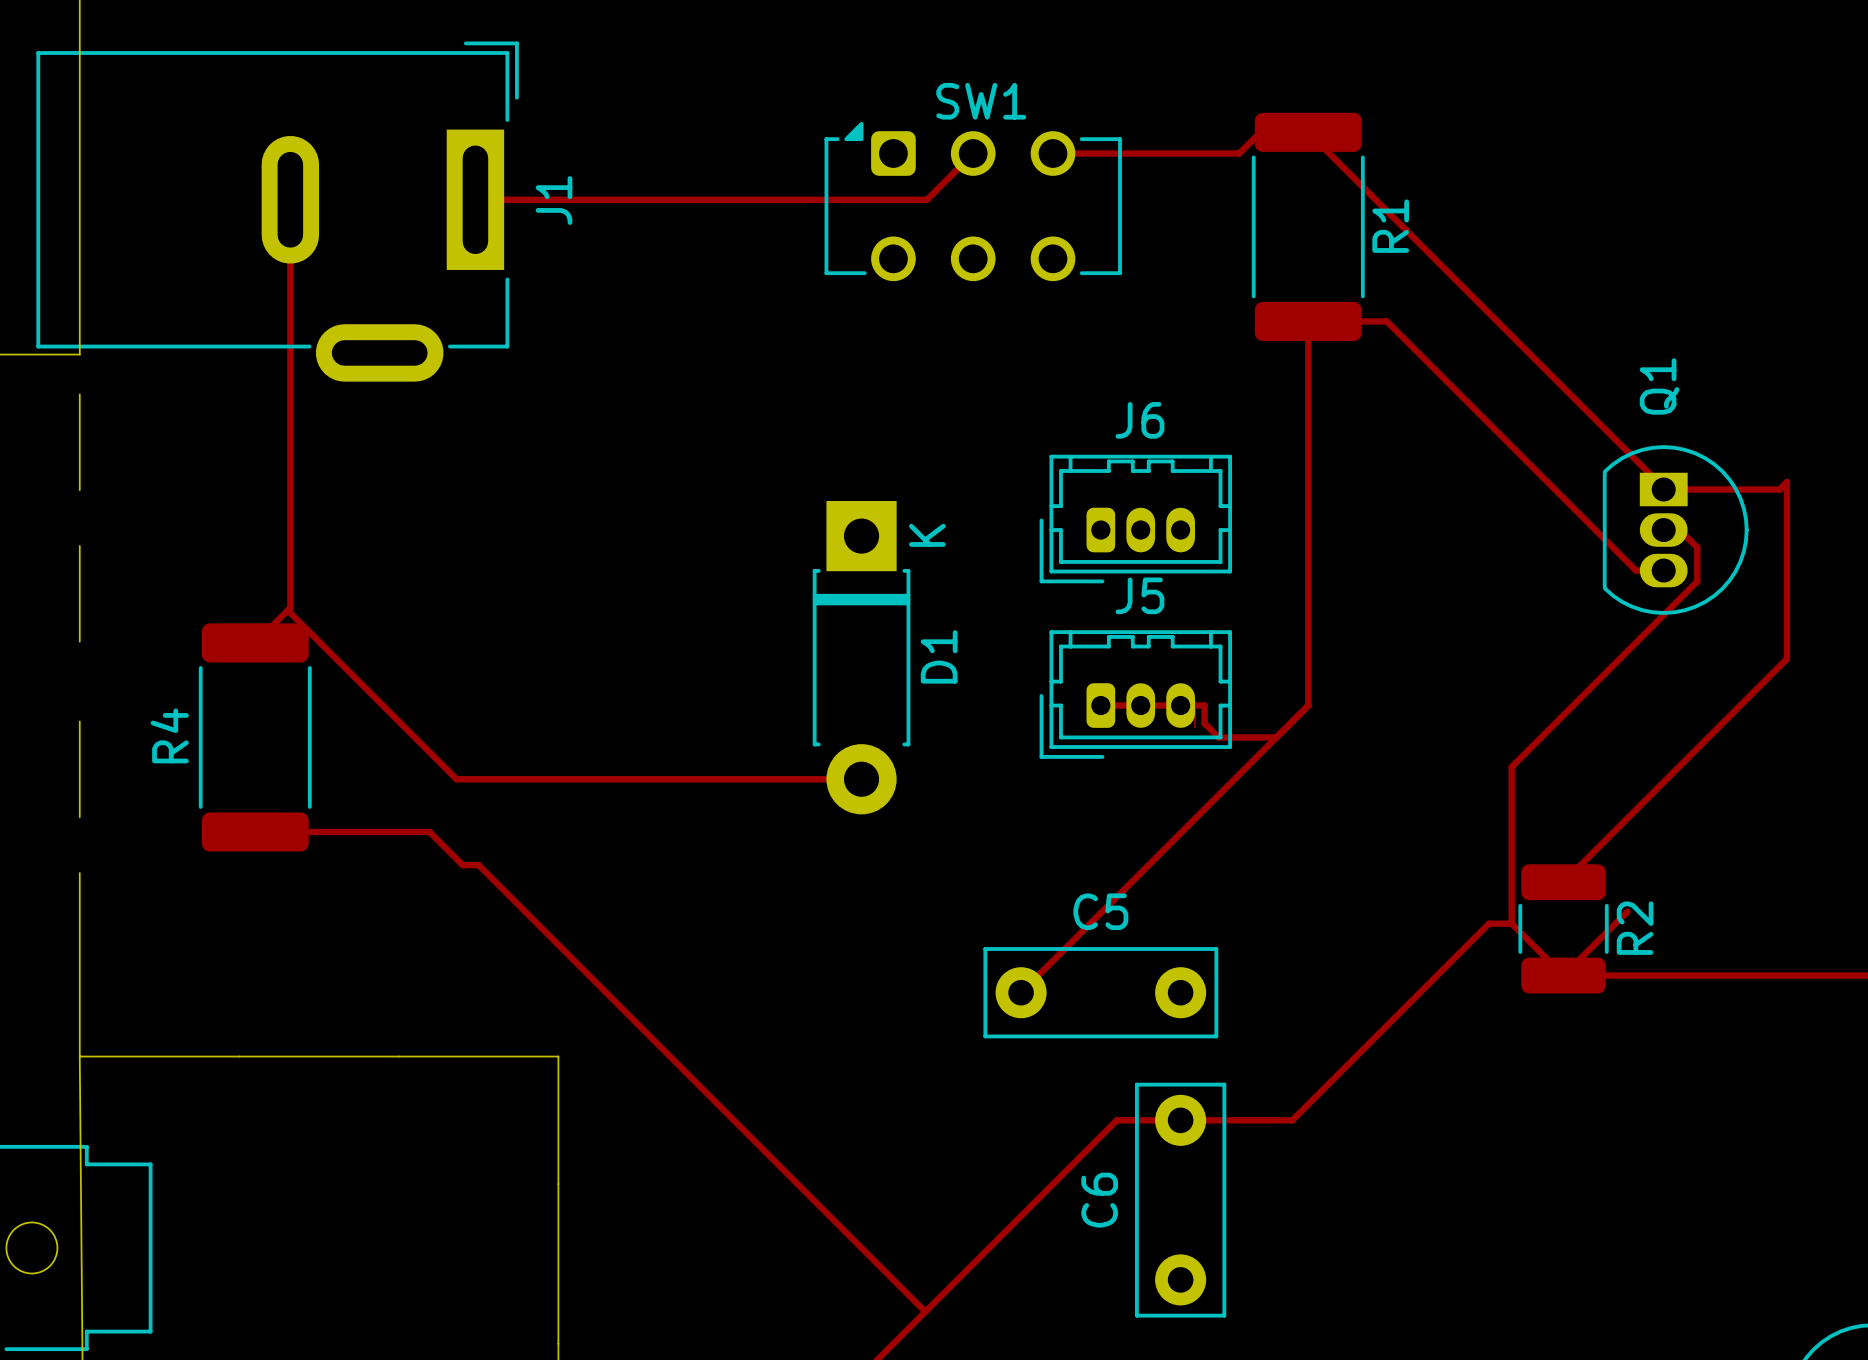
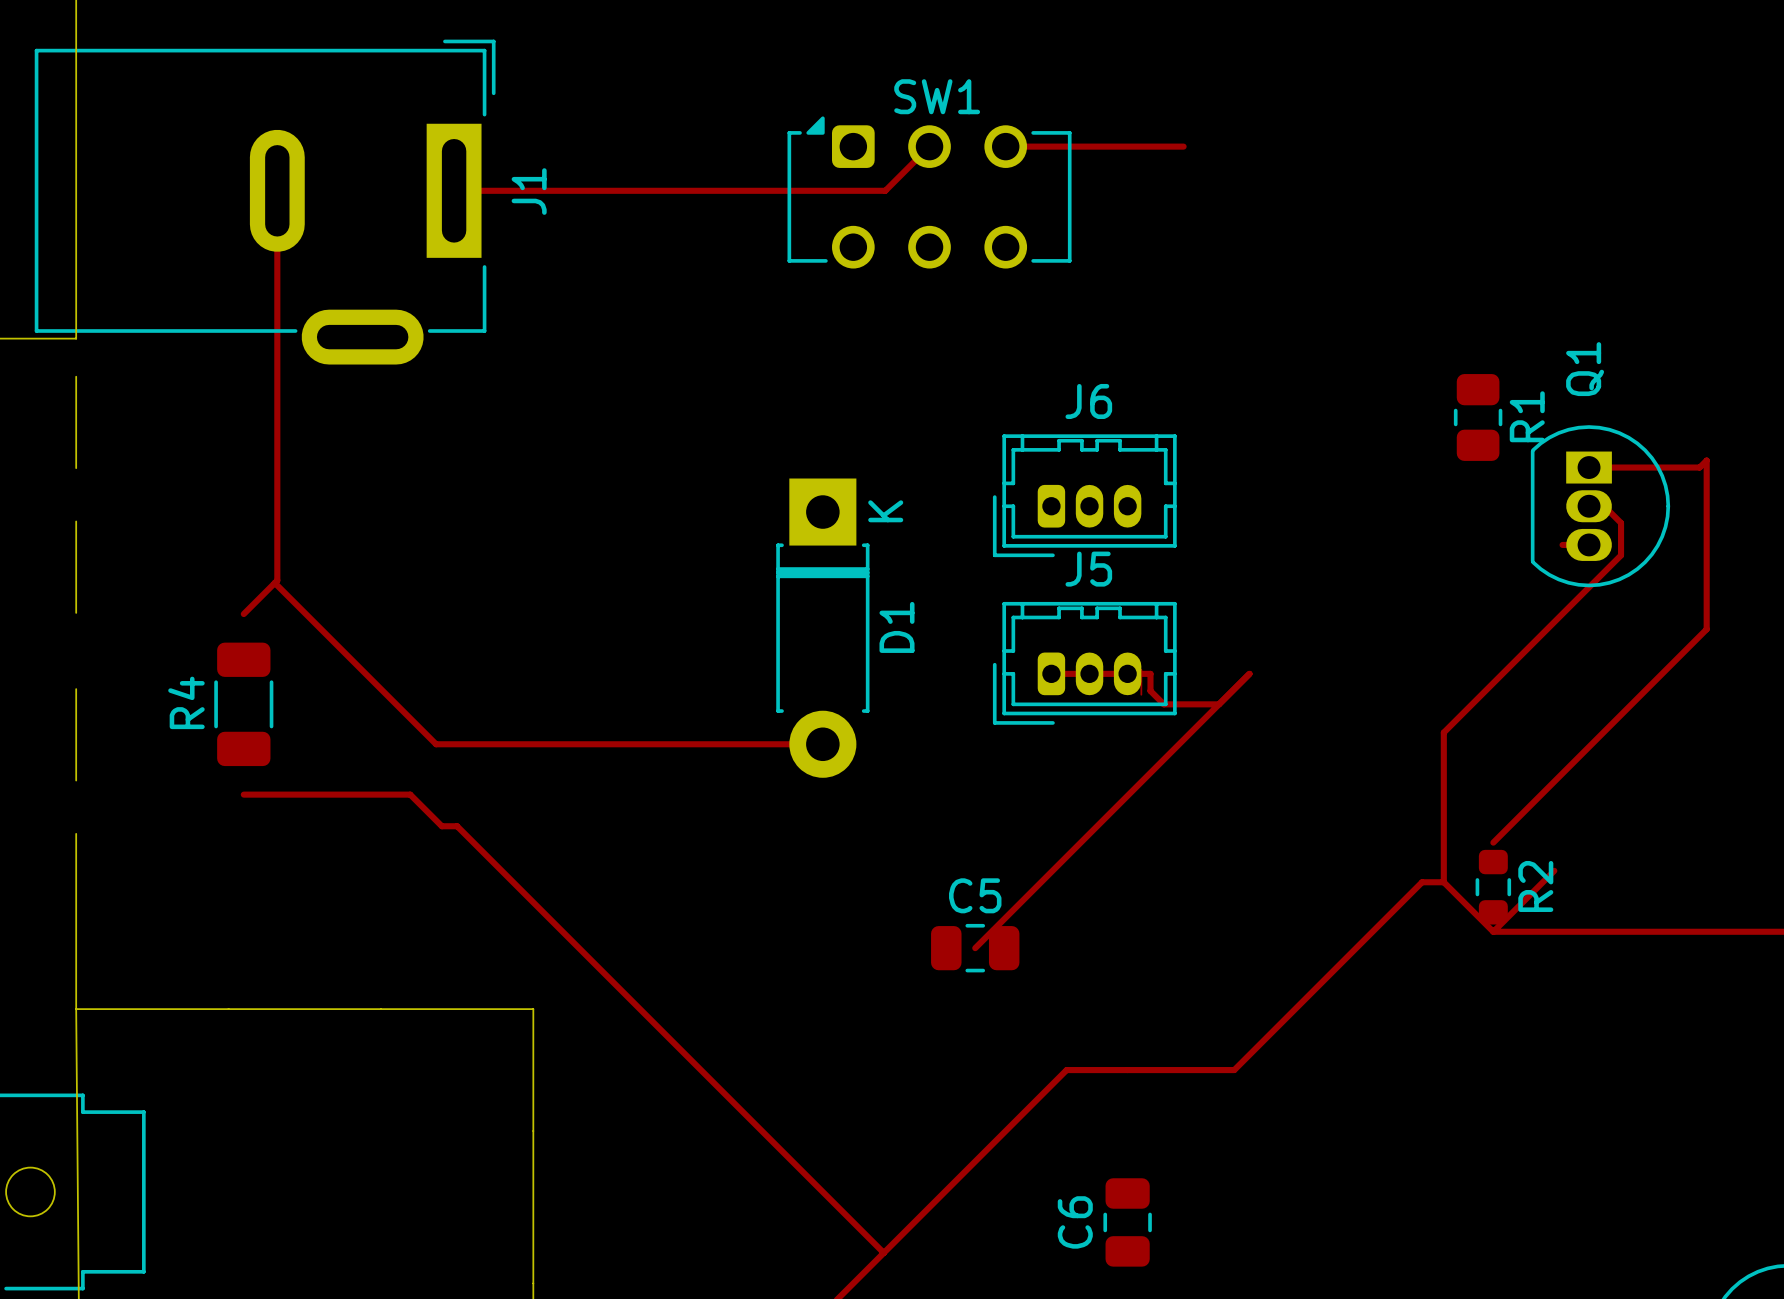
R1 footprint: [1251, 112, 1365, 341] -> [1453, 374, 1503, 461]
track: (1261, 131) (1239, 153) -> none
track: (1308, 132) (1663, 487) -> none
track: (1635, 570) (1386, 321) (1308, 321) (1308, 705) -> none
R4 footprint: [198, 623, 312, 852] -> [214, 642, 274, 767]
R2 footprint: [1518, 864, 1609, 994] -> [1475, 849, 1512, 925]
C5 footprint: [983, 947, 1219, 1039] -> [931, 923, 1020, 973]
C6 footprint: [1135, 1082, 1227, 1318] -> [1103, 1178, 1152, 1267]

